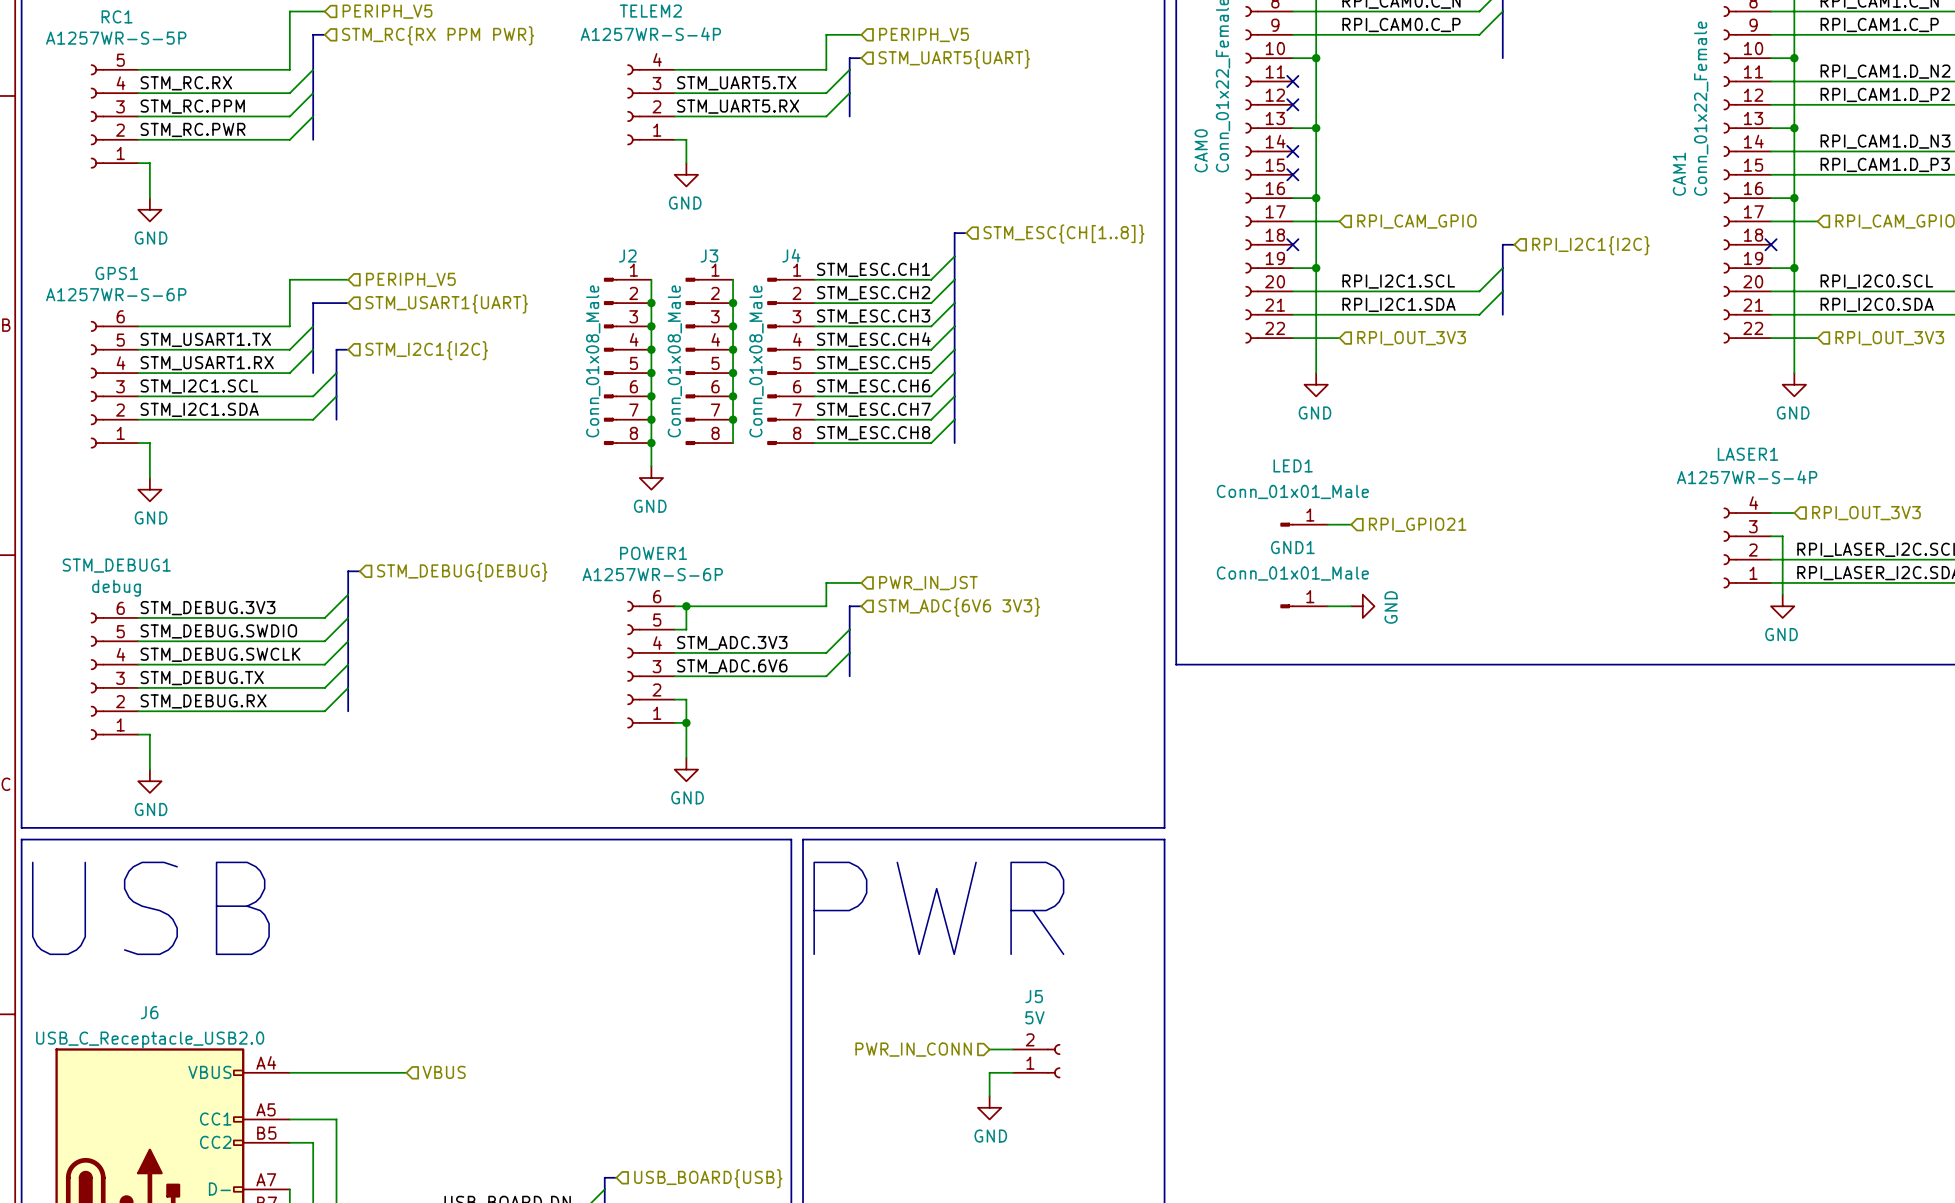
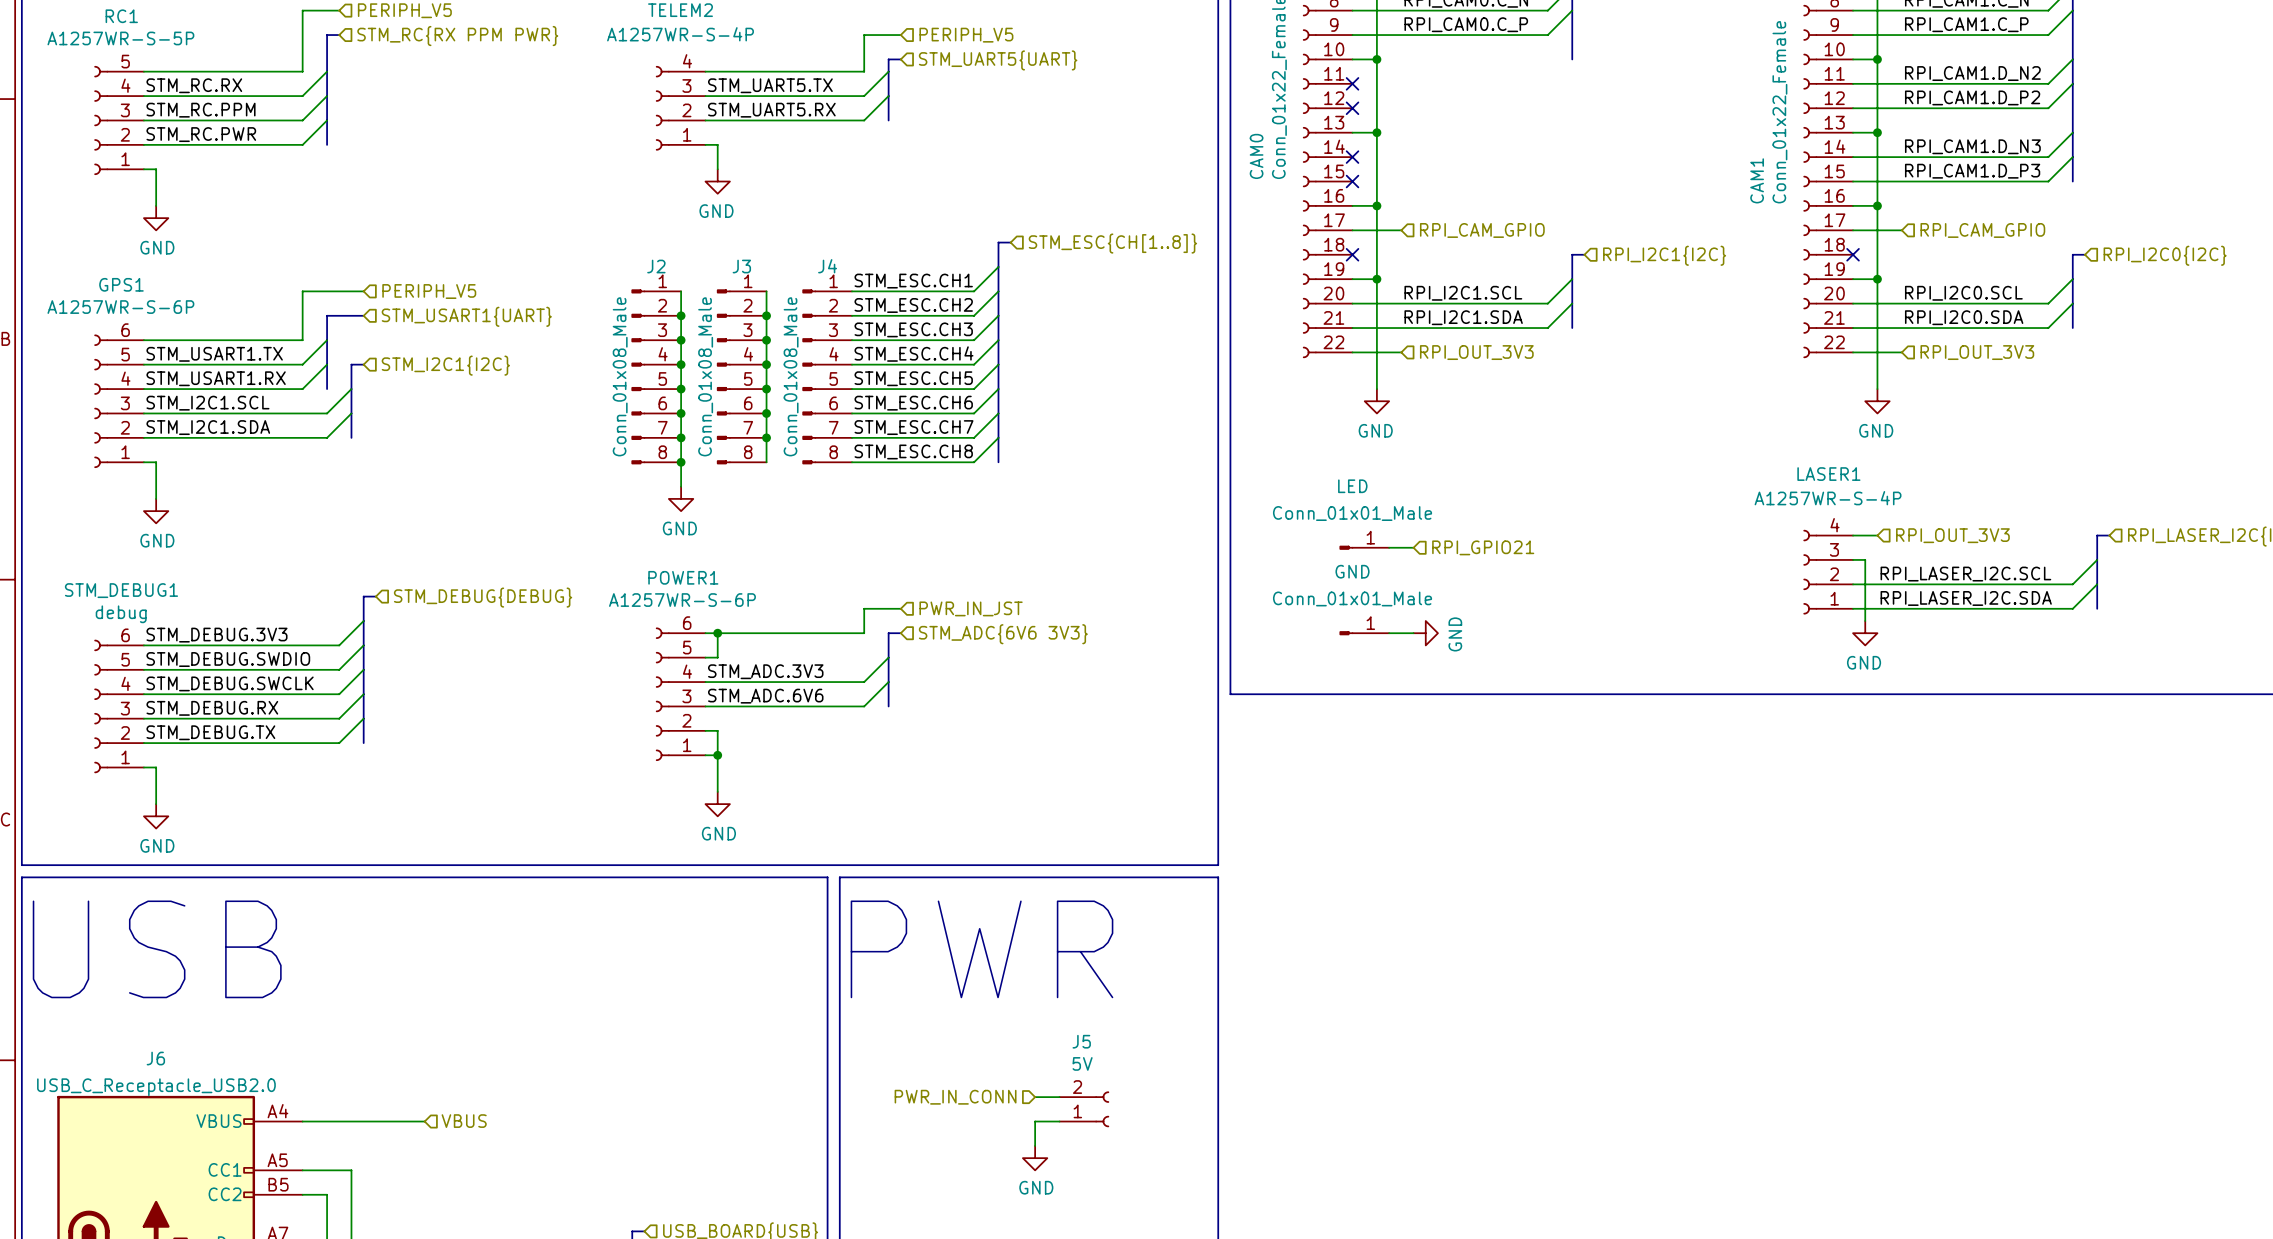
LED1 name: LED1 (1293, 465) -> LED (1352, 486)
GND1 name: GND1 (1292, 547) -> GND (1352, 571)
label: STM_DEBUG.TX (202, 678) -> STM_DEBUG.RX (212, 708)
label: STM_DEBUG.RX (203, 701) -> STM_DEBUG.TX (210, 732)

